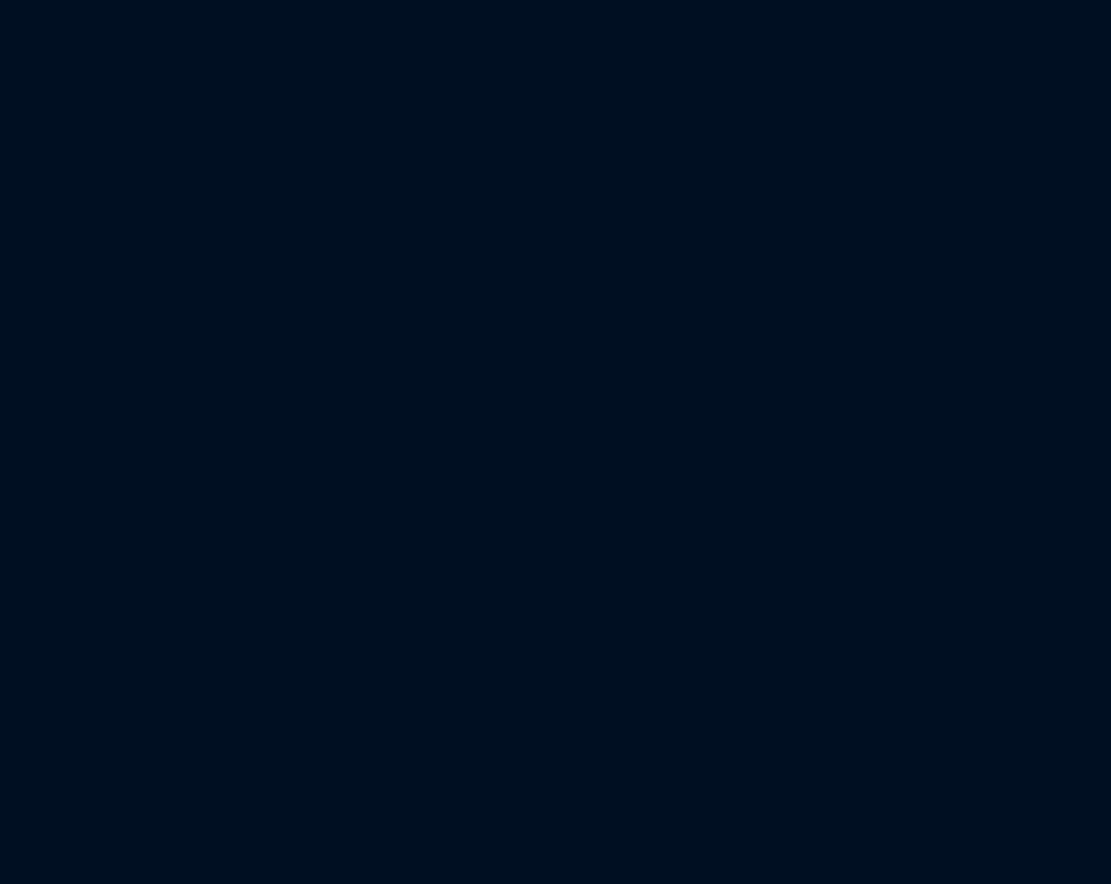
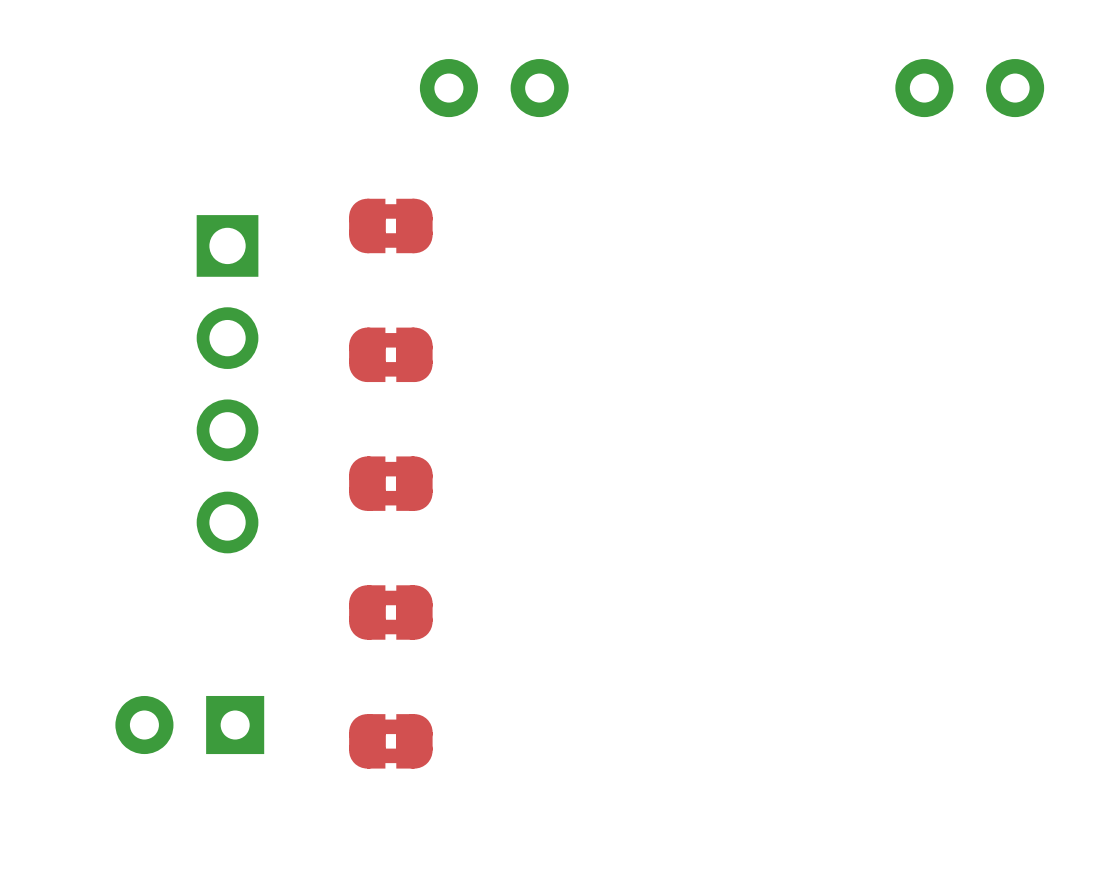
part: none -> (494, 88)
part: none -> (969, 88)
part: none -> (390, 225)
part: none -> (390, 354)
part: none -> (227, 384)
part: none -> (390, 483)
part: none -> (390, 612)
part: none -> (189, 725)
part: none -> (390, 741)

